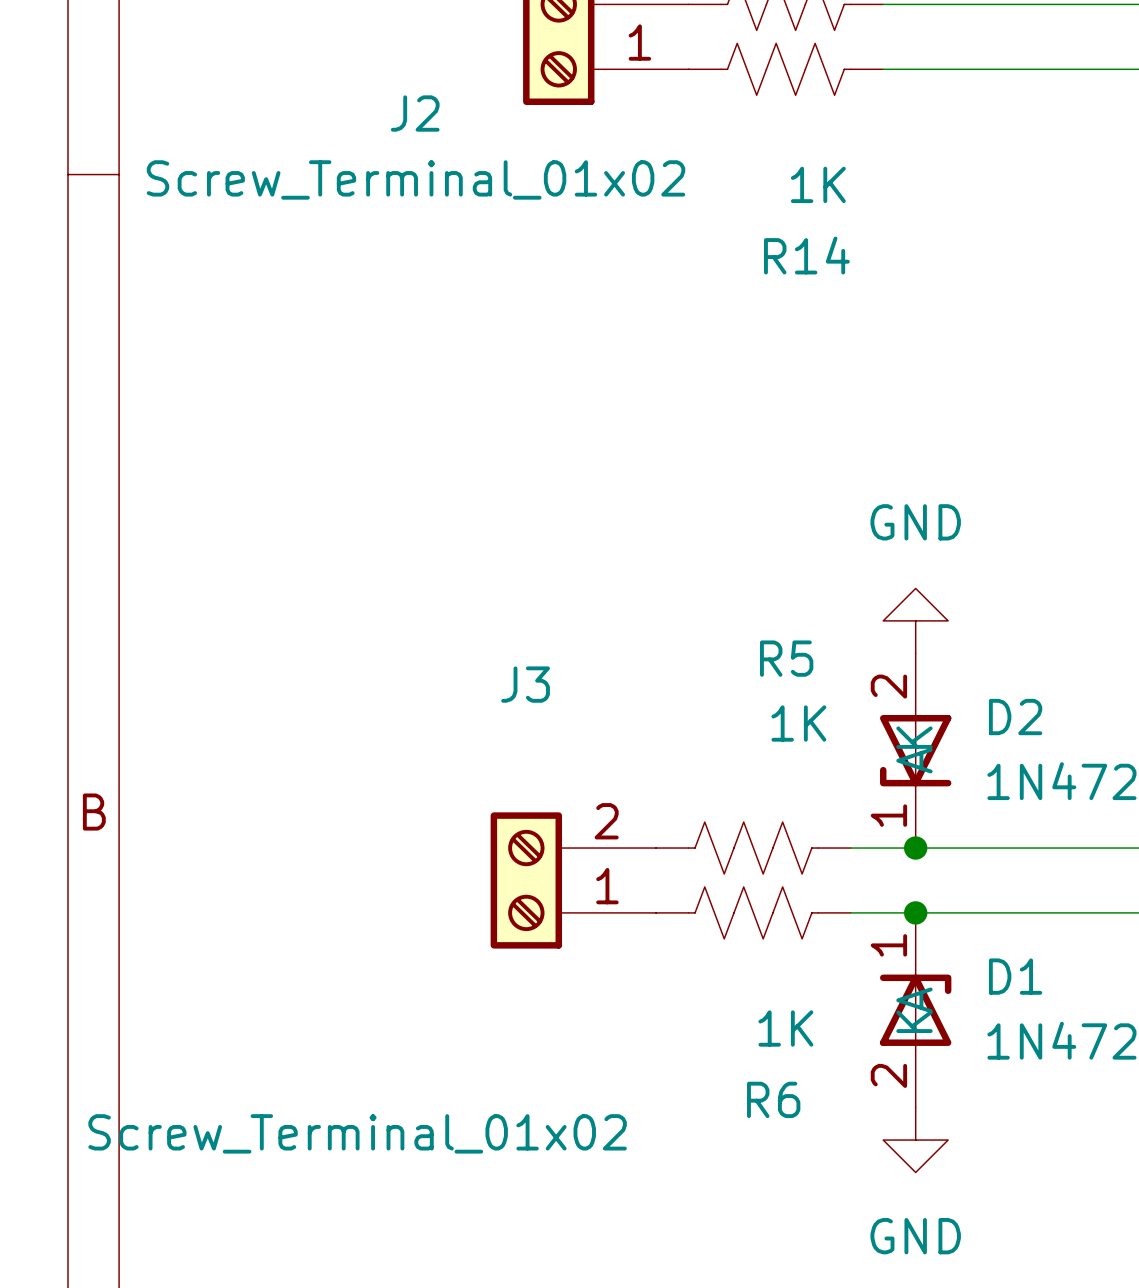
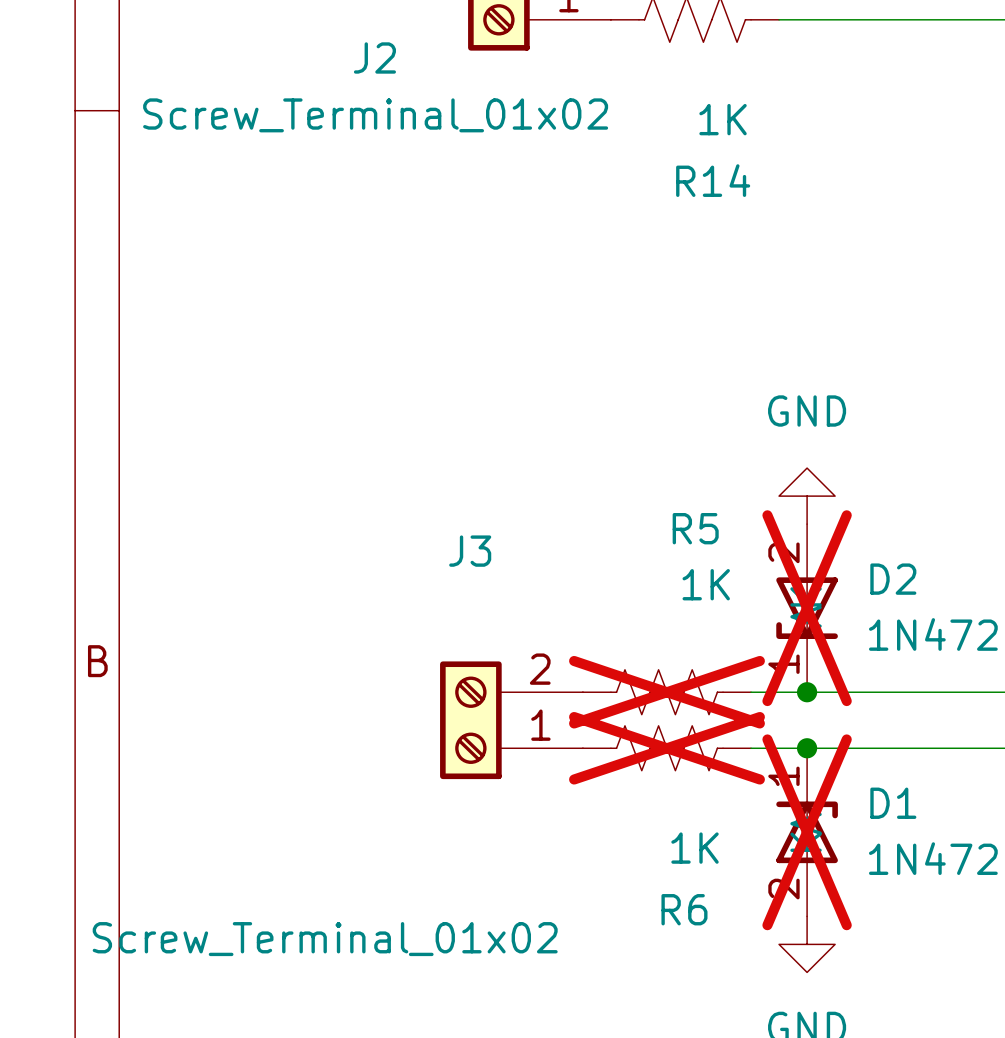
D2 do-not-place cross: none -> (807, 608)
R5 do-not-place cross: none -> (666, 692)
R6 do-not-place cross: none -> (666, 748)
D1 do-not-place cross: none -> (807, 832)

